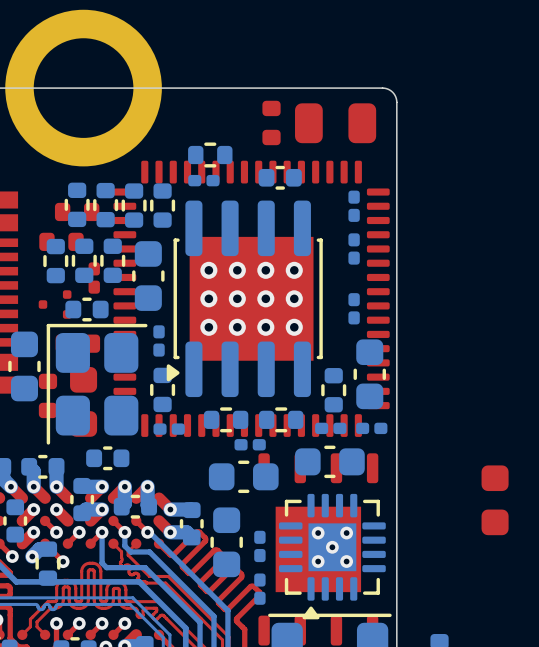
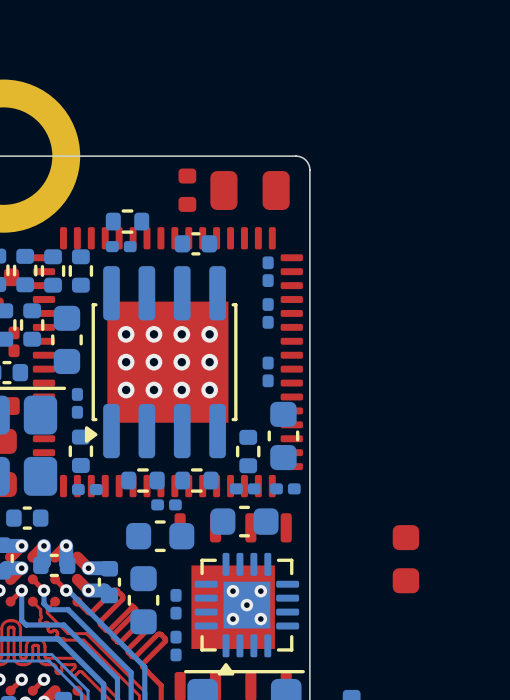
top track: (218, 551) (223, 558) (200, 582) (200, 585) (209, 591) (234, 567) (242, 576) (218, 600) (224, 609) (227, 609) (251, 586) (260, 593) (236, 618) (237, 621) -> (135, 608) (135, 612) (113, 636) (120, 642) (143, 619) (146, 619) (150, 626) (127, 650) (133, 657) (157, 634) (164, 638) (165, 641) (142, 664) (153, 678)

